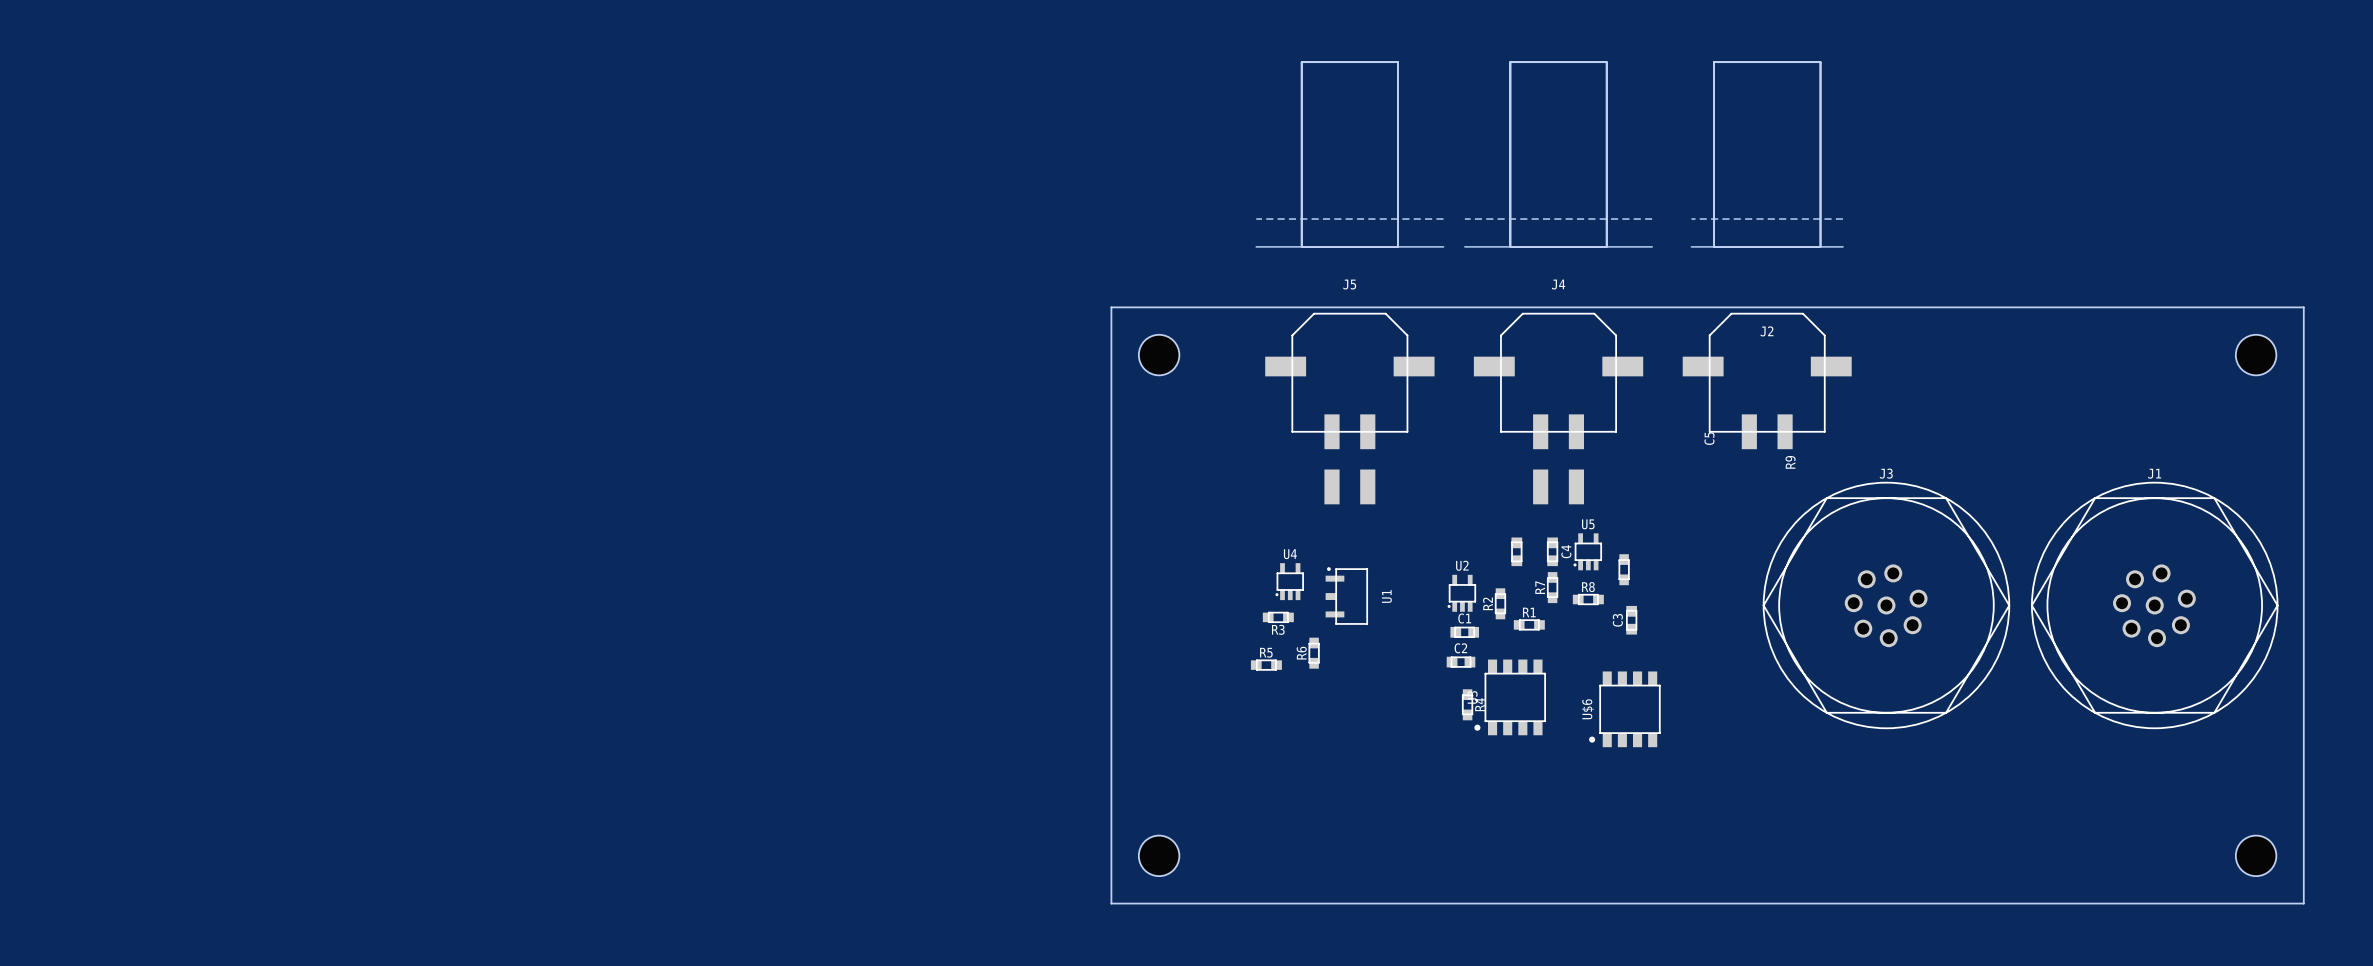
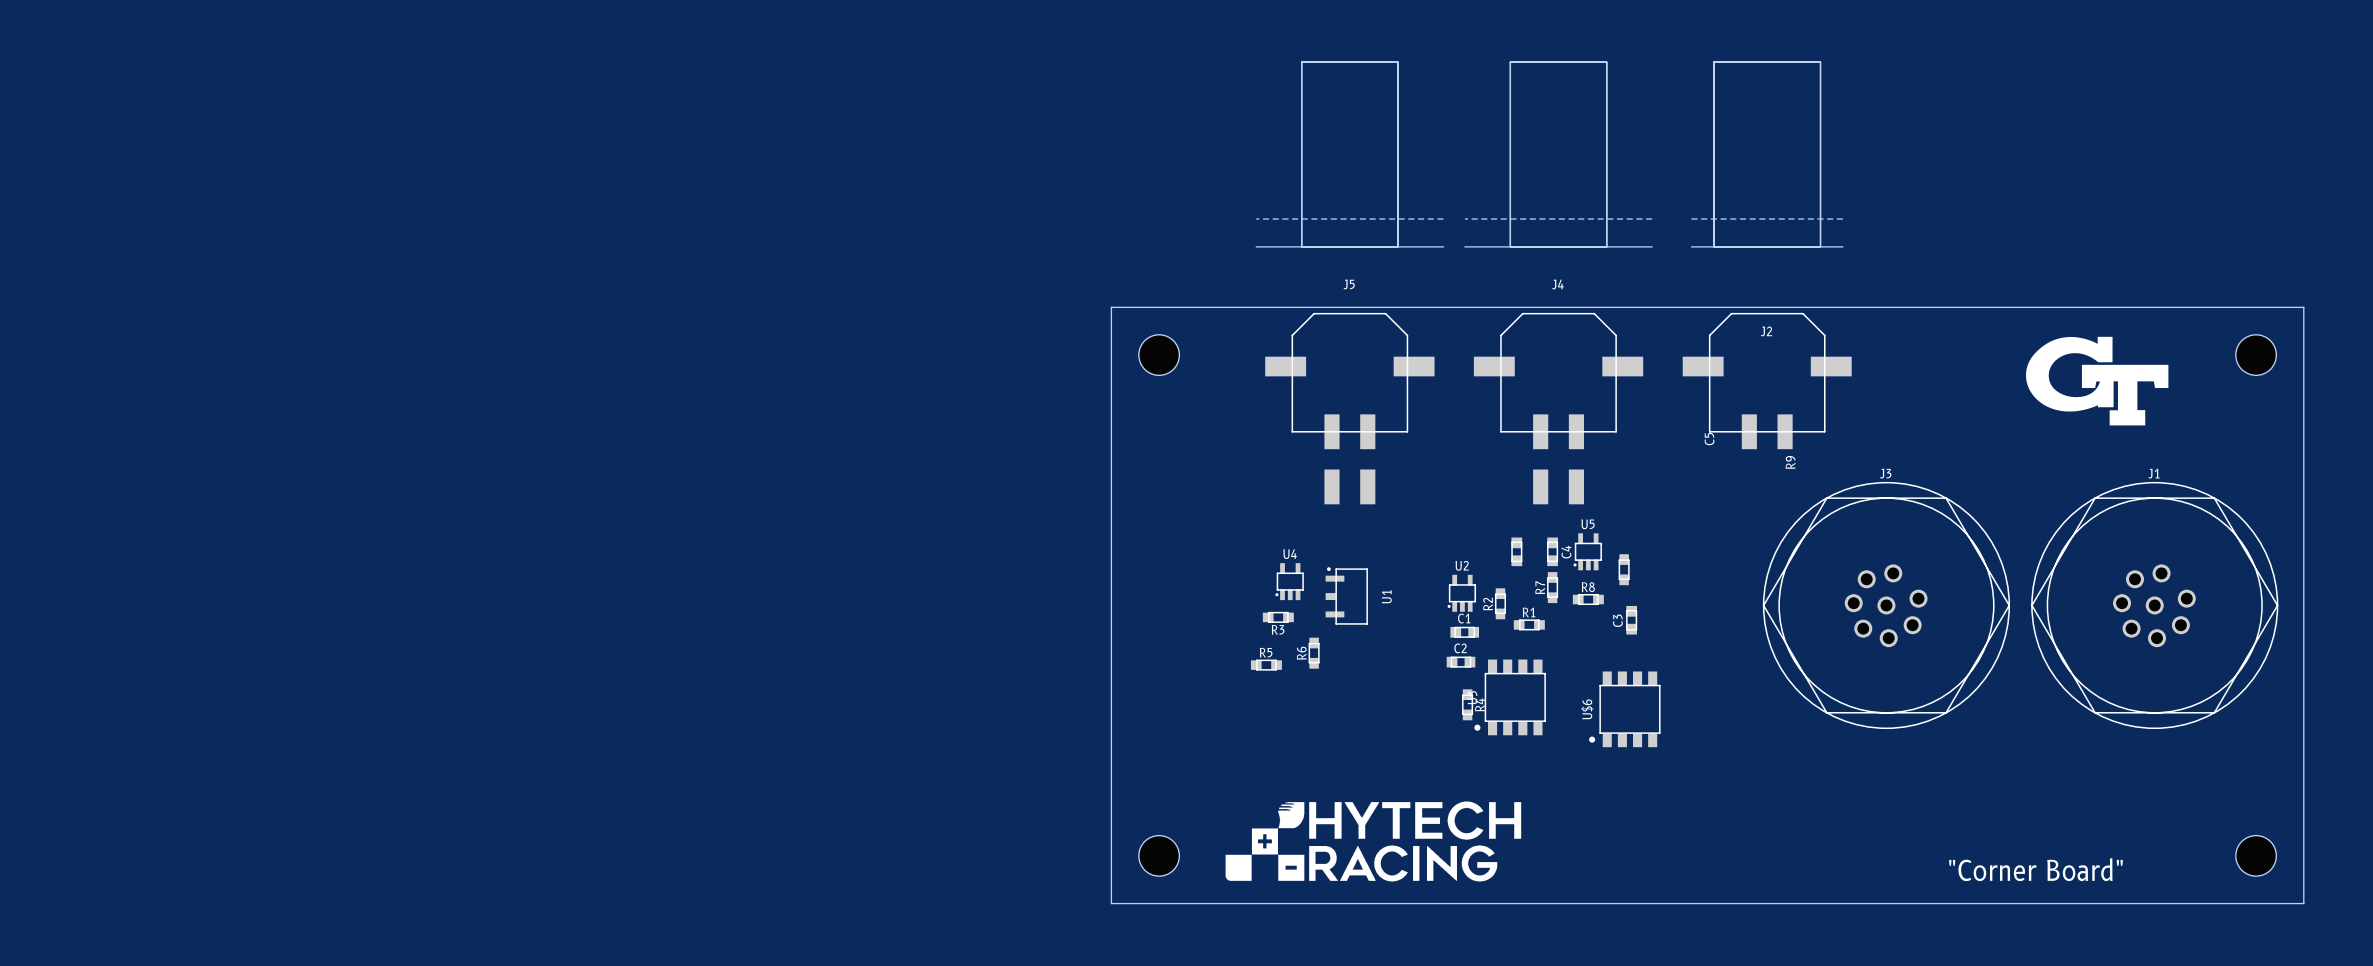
drawing: none -> [2026, 336, 2169, 426]
drawing: none -> [1225, 801, 1522, 882]
text: none -> "Corner Board" (2035, 869)

